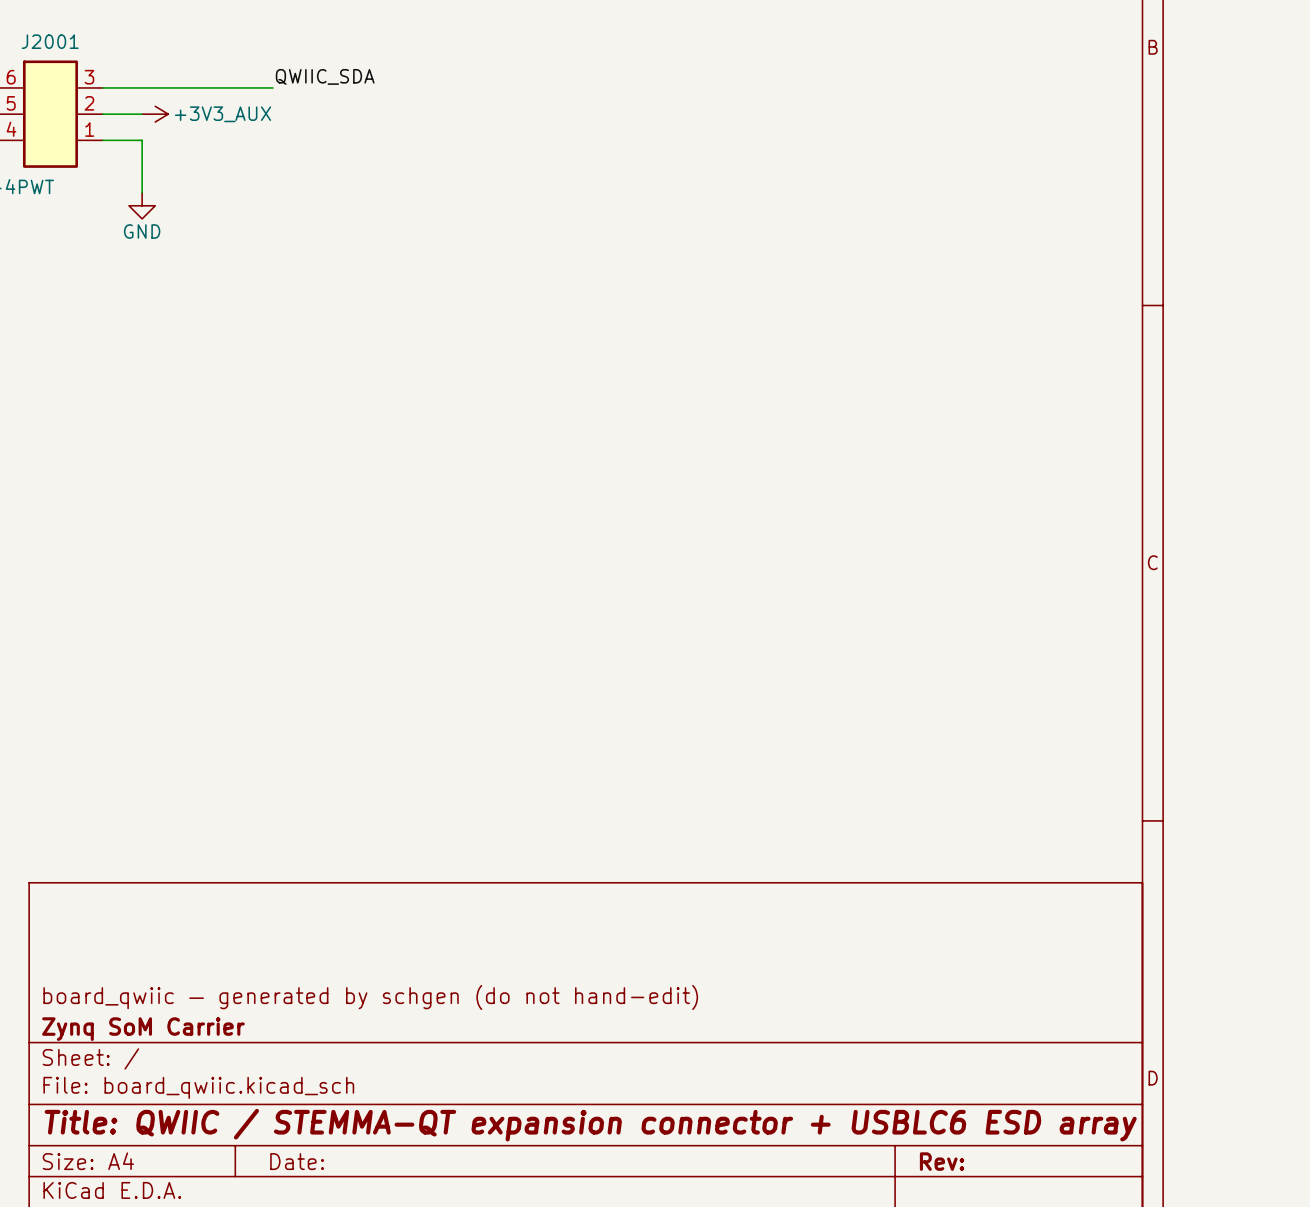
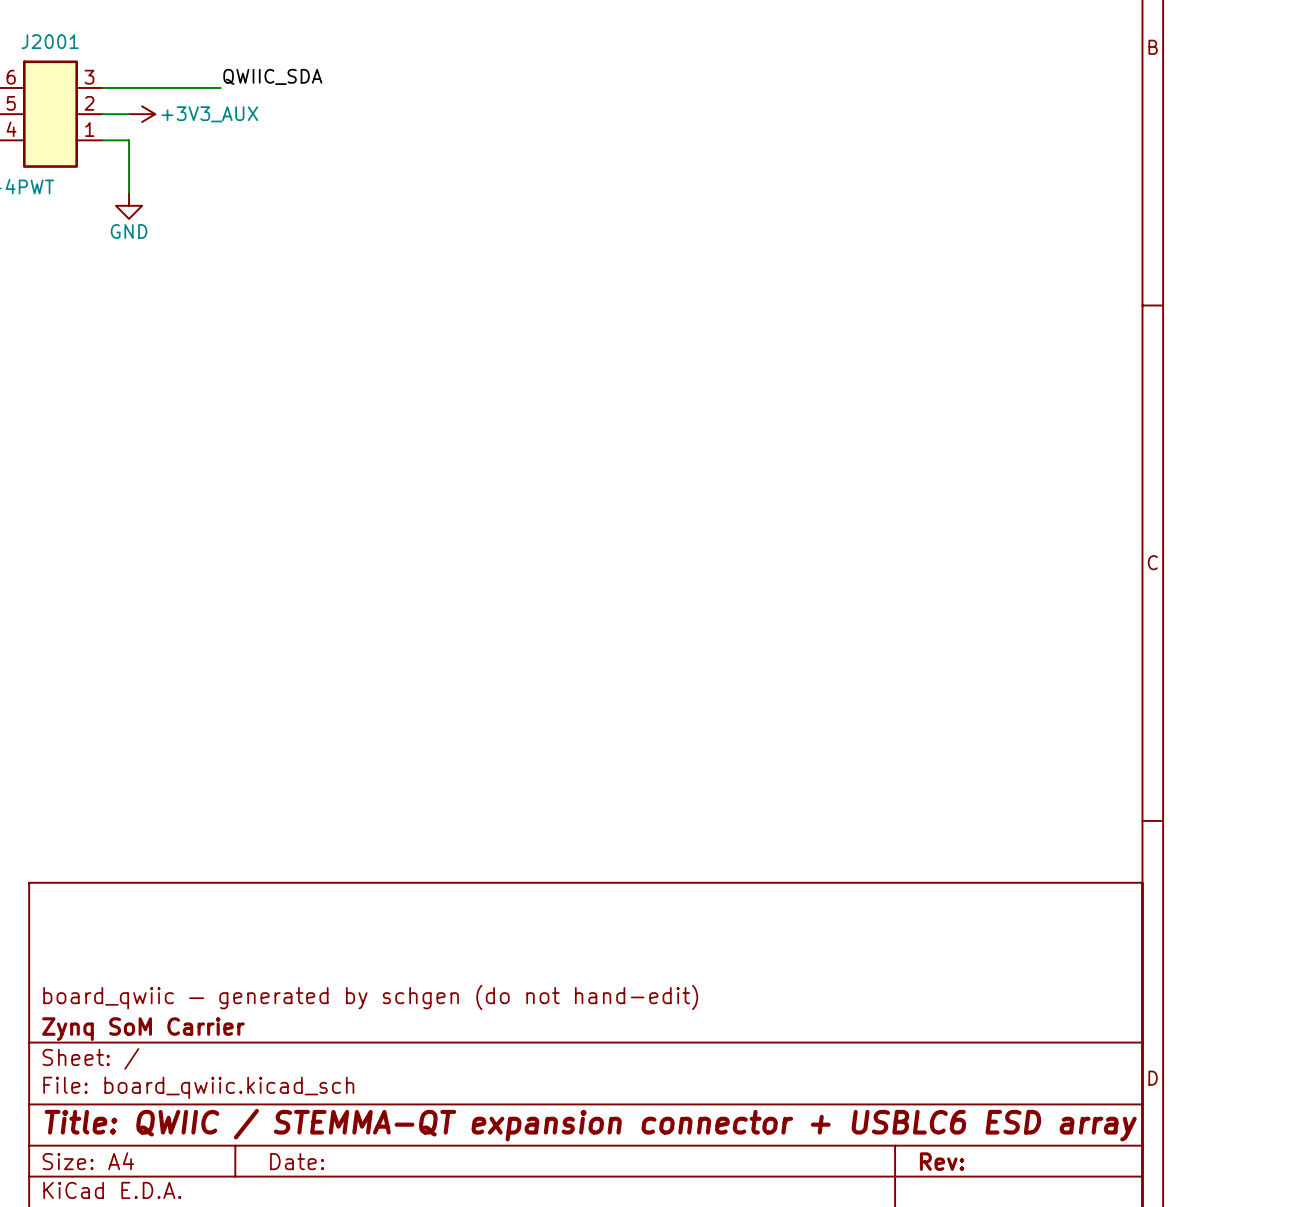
label position: QWIIC_SDA (325, 76) -> QWIIC_SDA (272, 76)
wire: (220, 87) (273, 87) -> none
power symbol position: +3V3_AUX (155, 114) -> +3V3_AUX (142, 114)
wire: (129, 140) (142, 140) (142, 192) -> (129, 140) (129, 192)
power symbol position: GND (142, 205) -> GND (129, 205)

